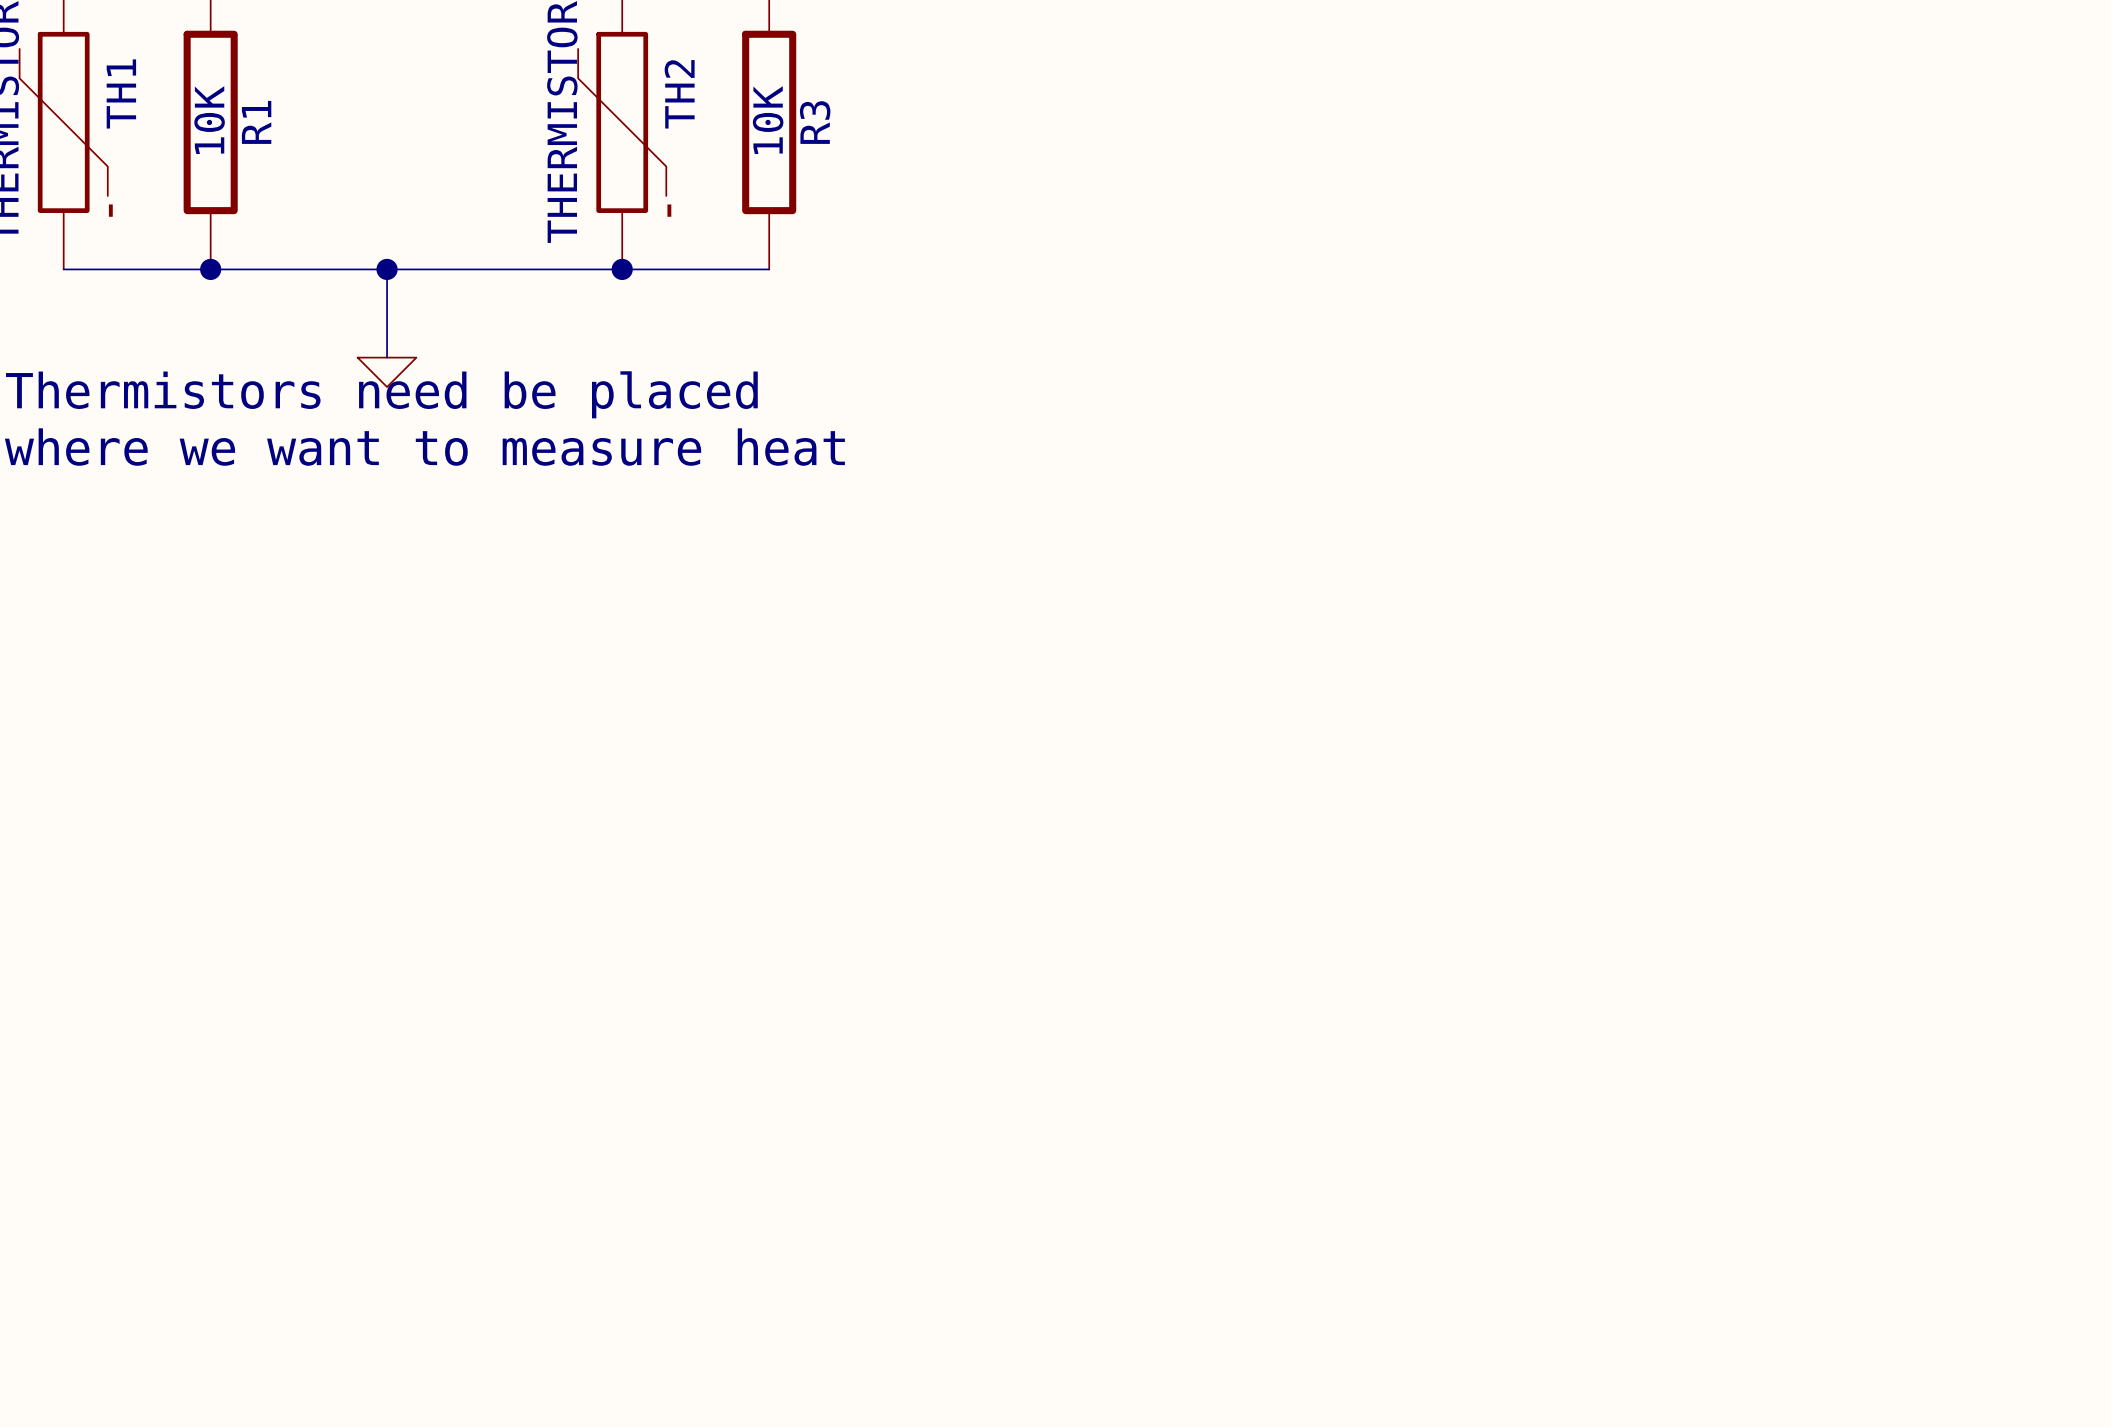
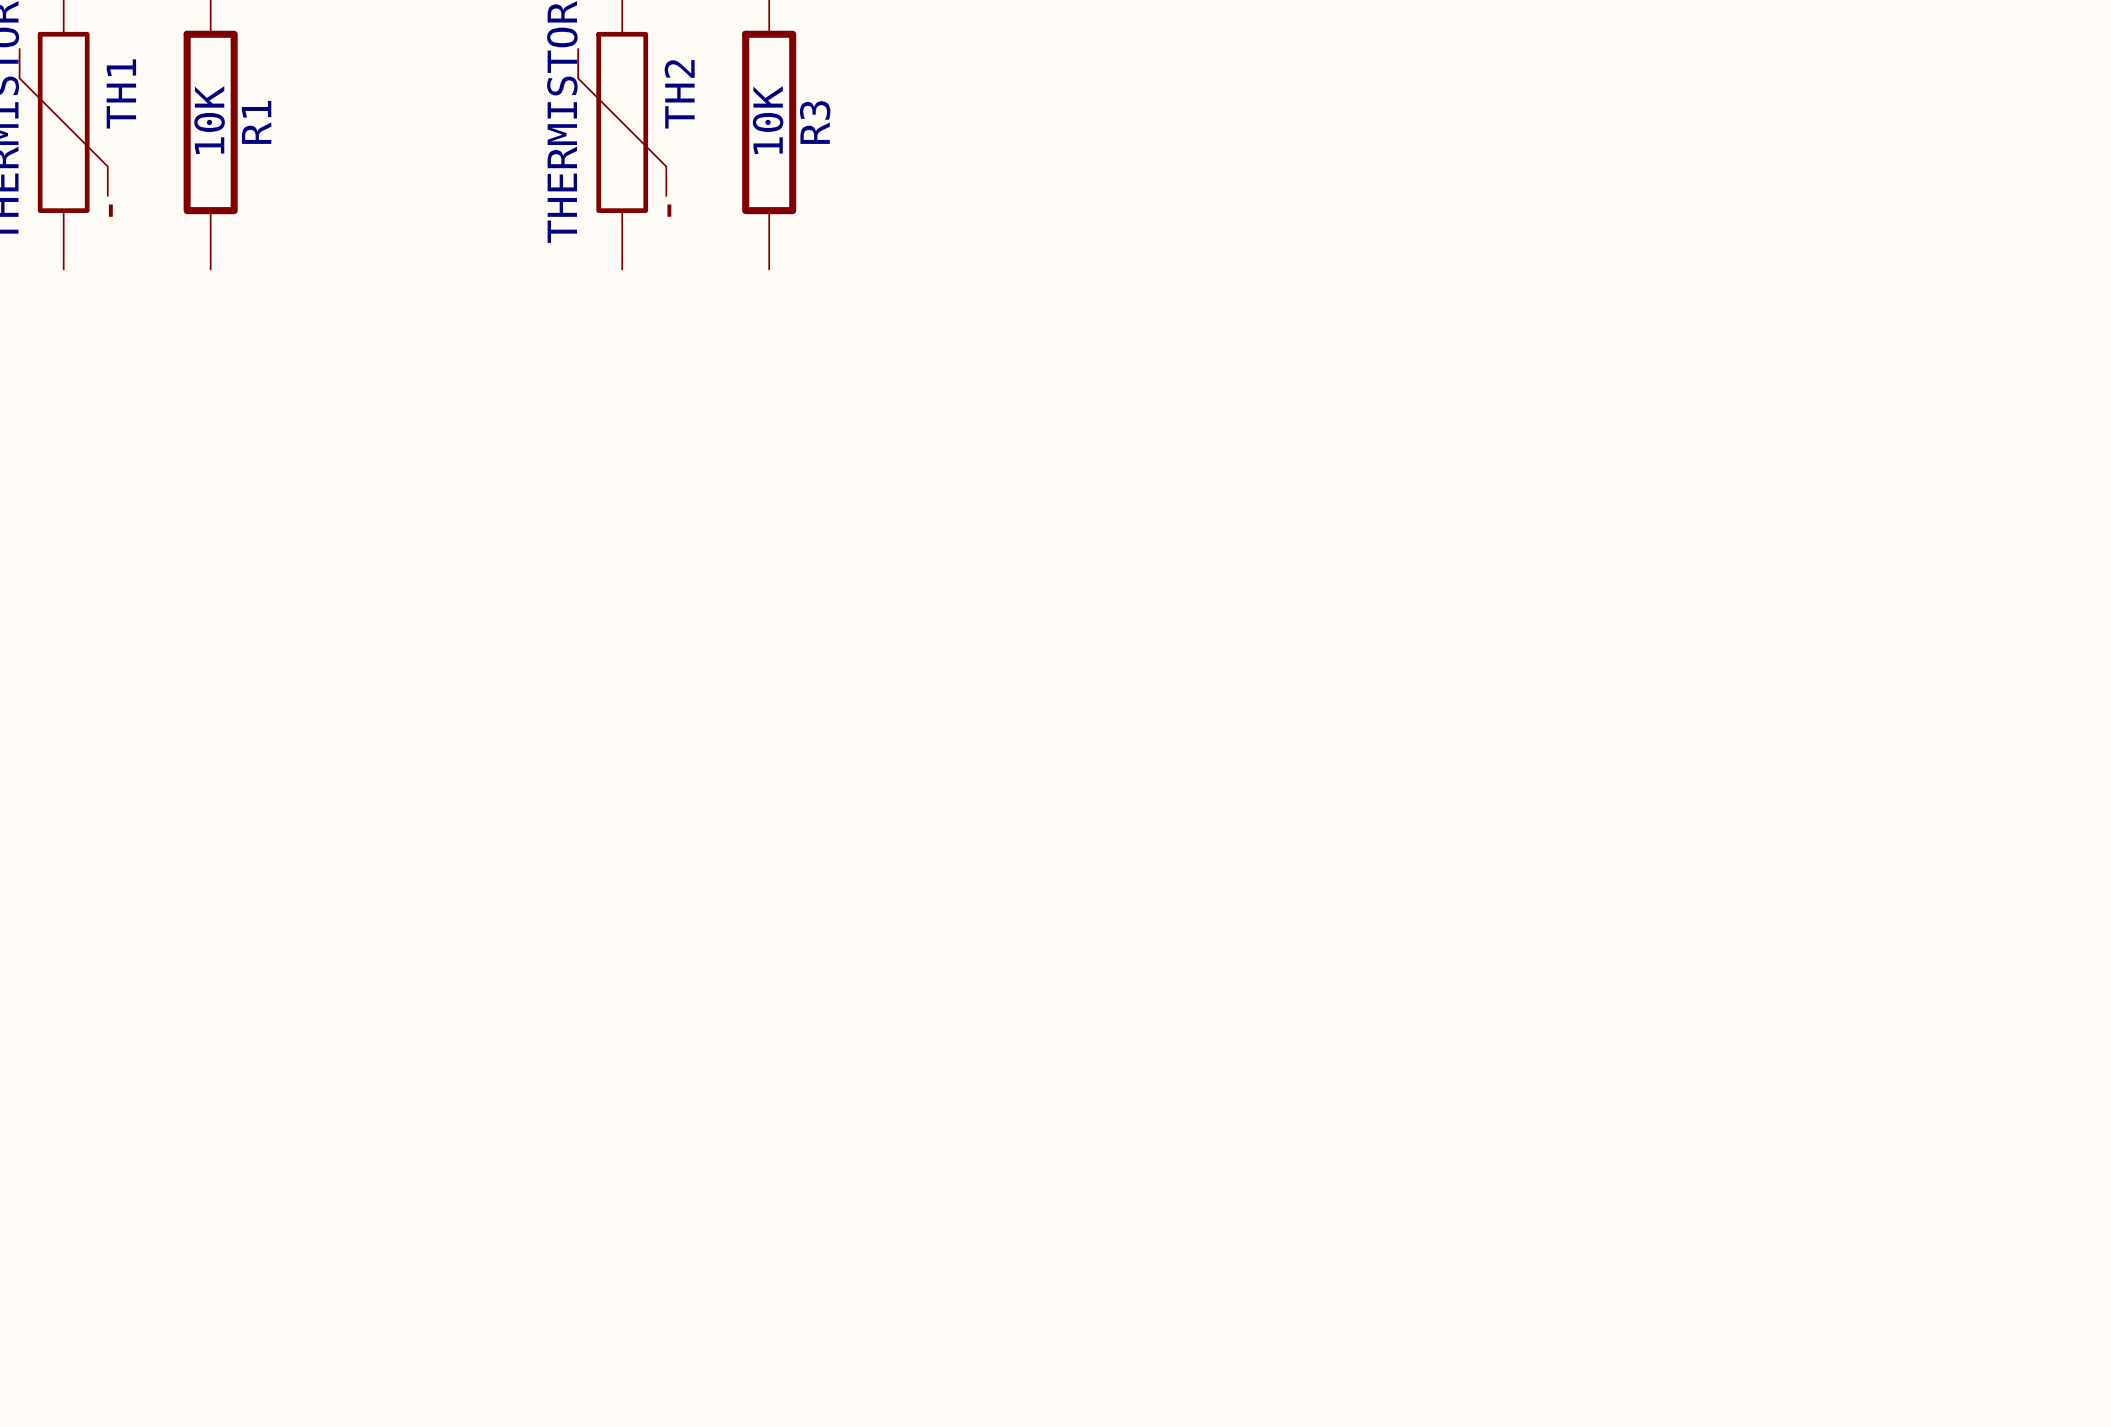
wire: (63, 269) (769, 269) -> none
junction: (210, 269) -> none
wire: (387, 269) (387, 357) -> none
junction: (387, 269) -> none
junction: (622, 269) -> none
power symbol: (387, 372) -> none
text: Thermistors need be placed (381, 394) -> none
text: where we want to measure heat (424, 447) -> none

